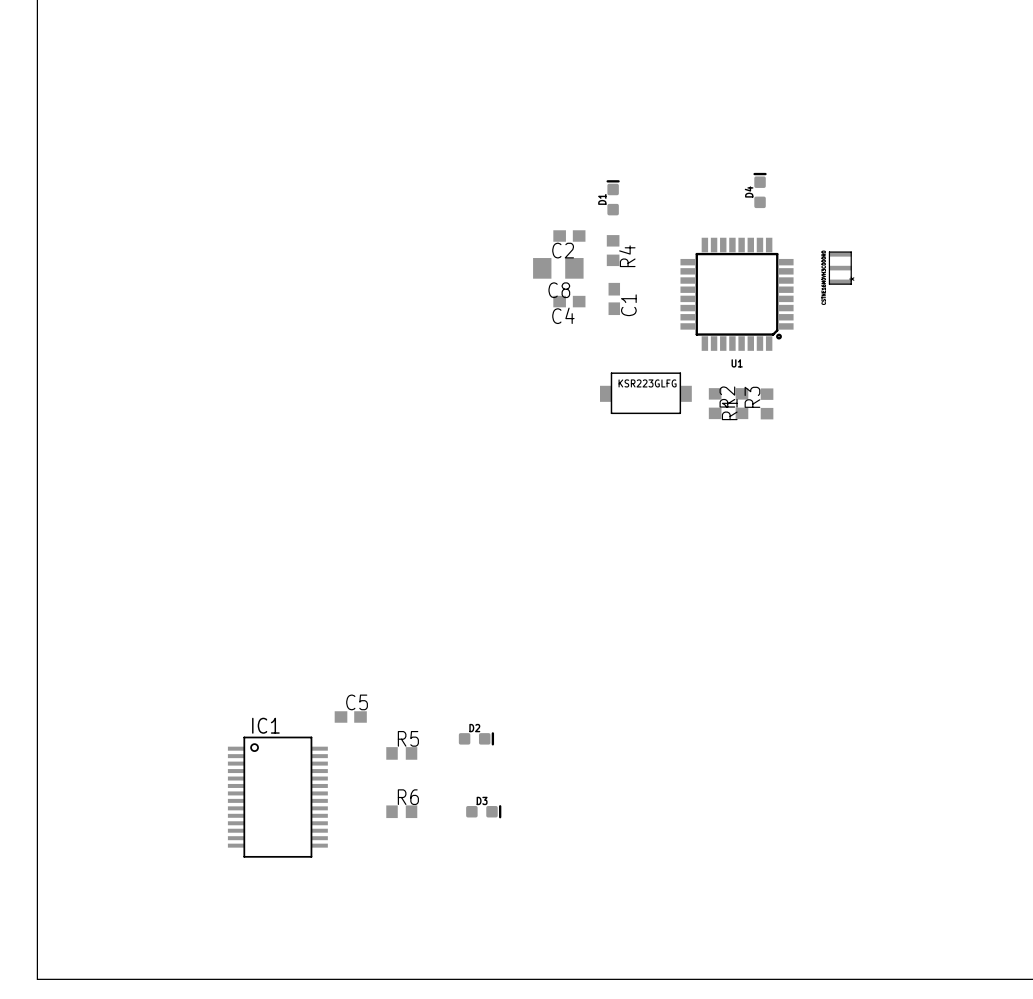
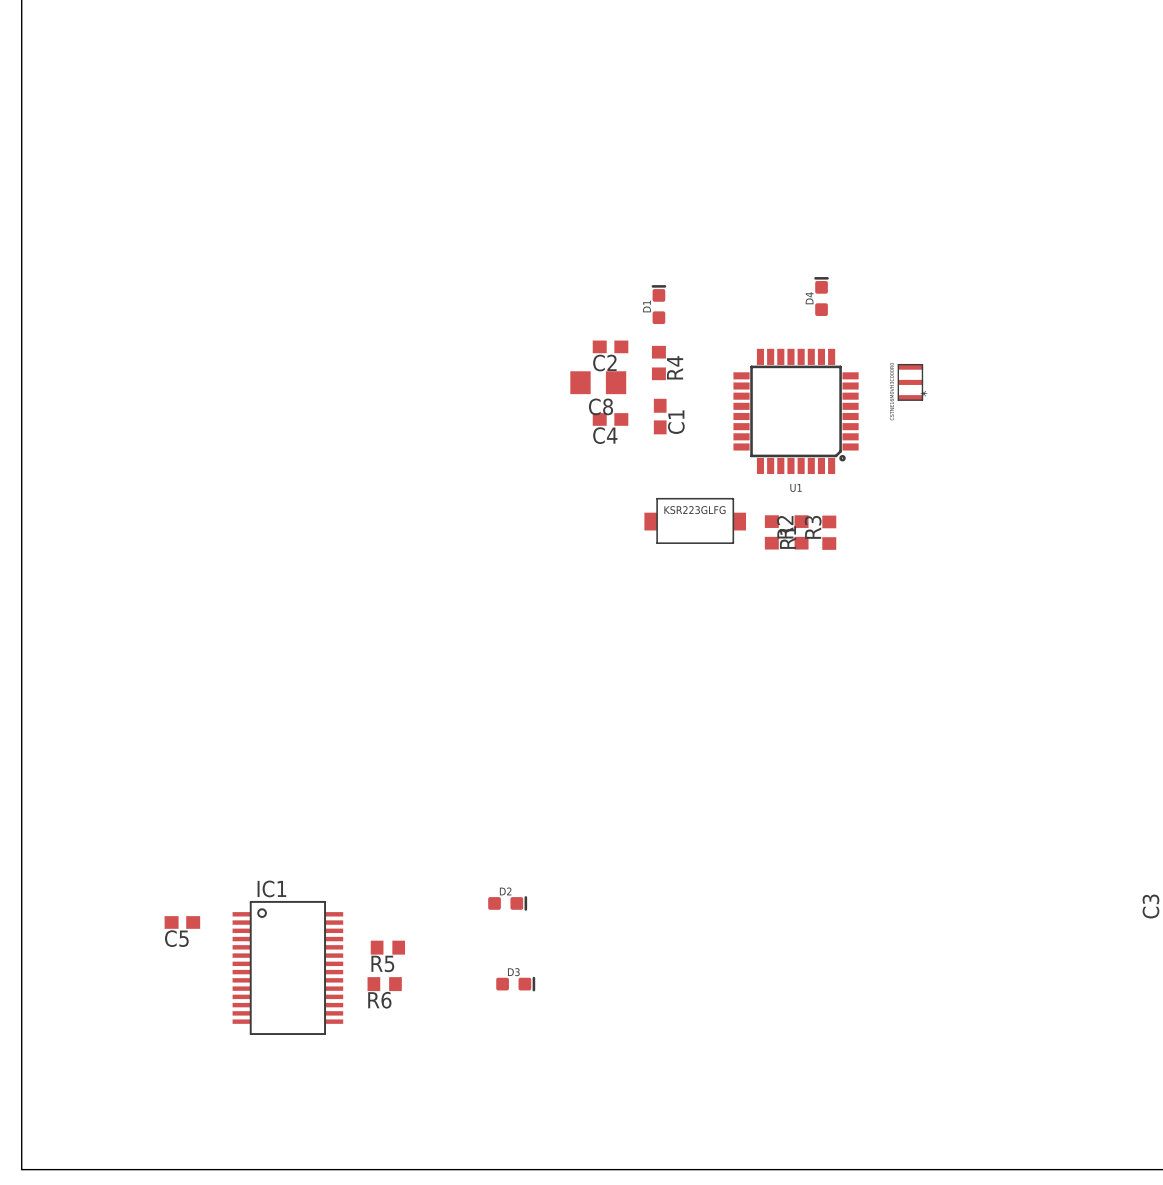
C5 name position: C5 (357, 702) -> C5 (176, 938)
C5 position: (350, 716) -> (182, 922)
R5 name position: R5 (408, 738) -> R5 (382, 963)
R5 position: (401, 753) -> (387, 947)
R6 name position: R6 (408, 797) -> R6 (379, 1000)
R6 position: (401, 811) -> (384, 984)

